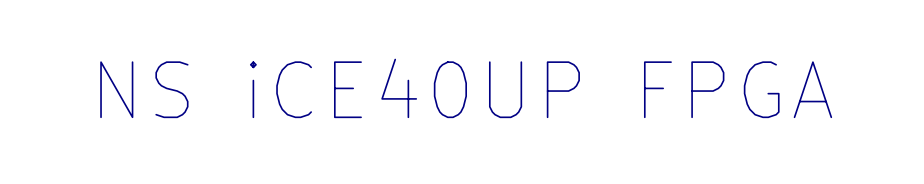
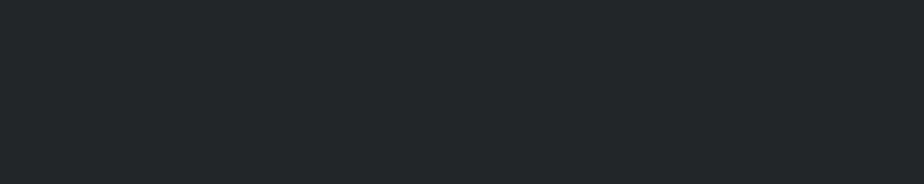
text: NS iCE40UP FPGA (466, 88) -> none

